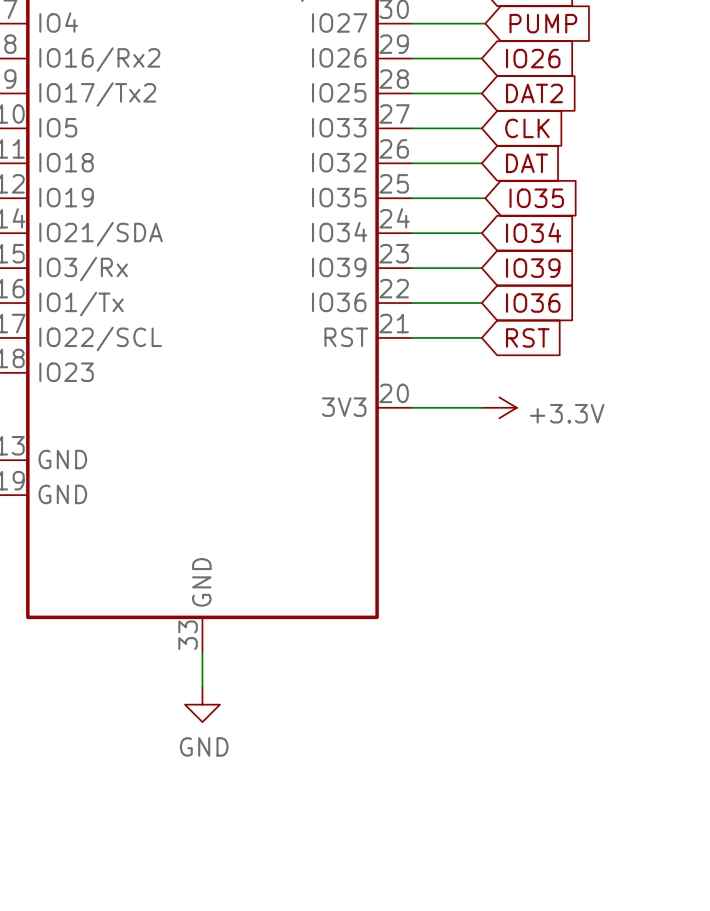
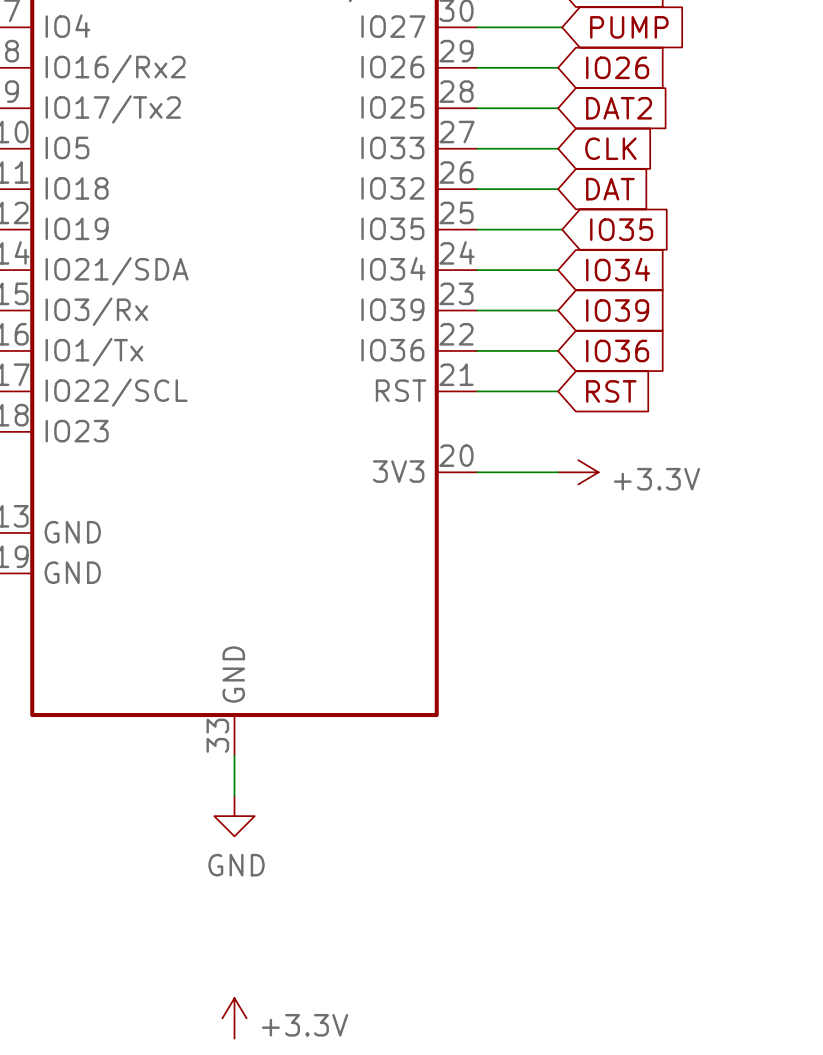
power symbol: none -> +3.3V (234, 1018)

